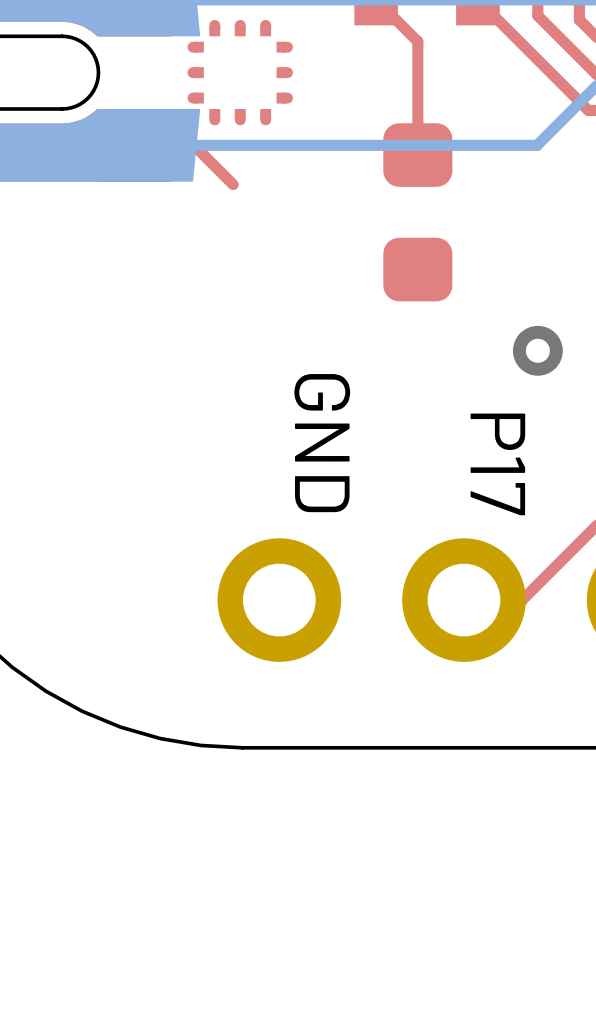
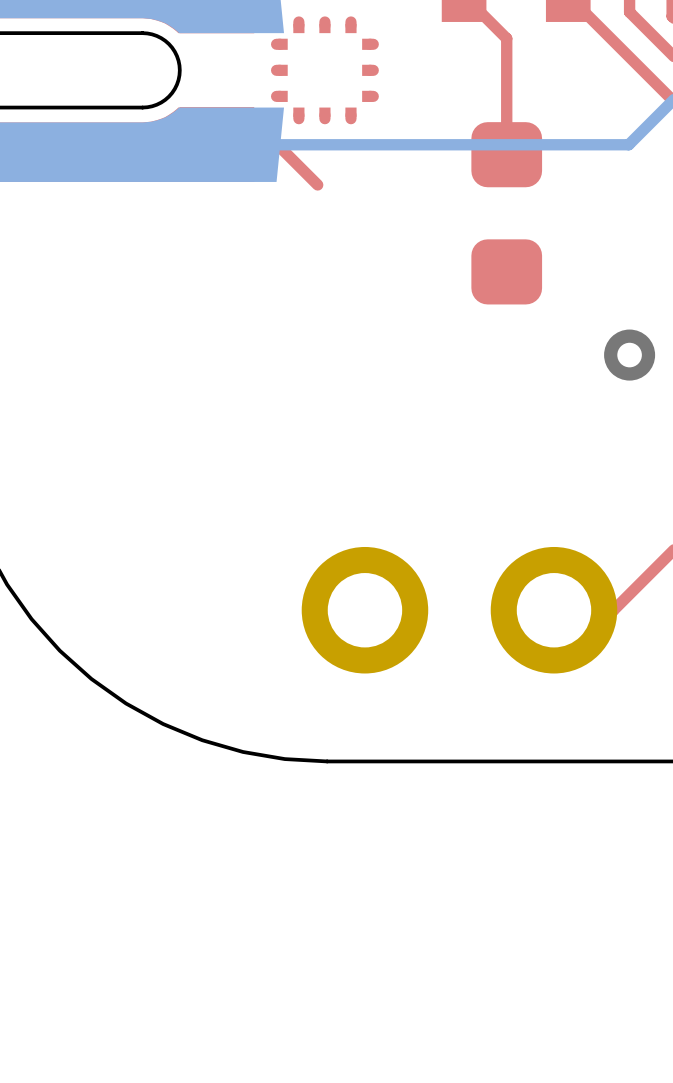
text: GND (322, 443) -> none
text: P17 (497, 464) -> none

